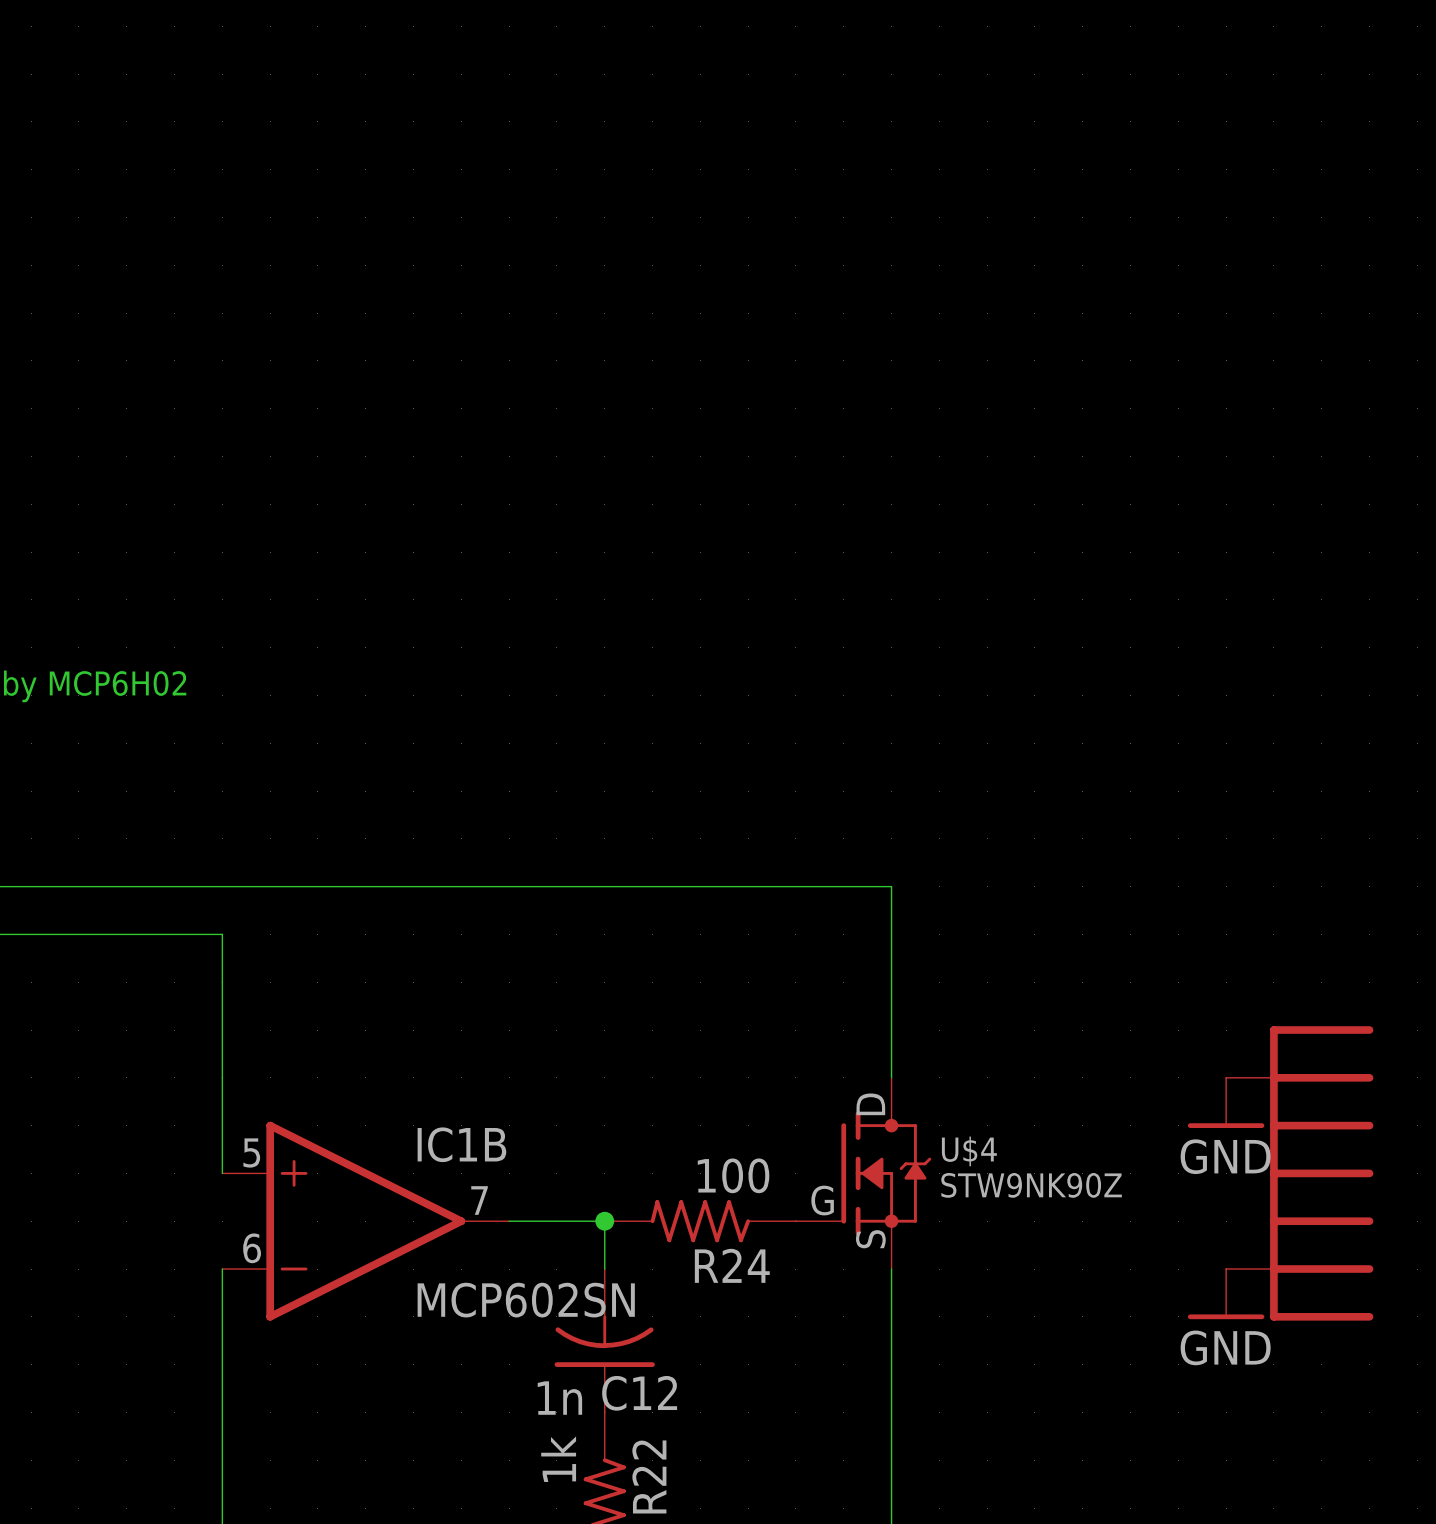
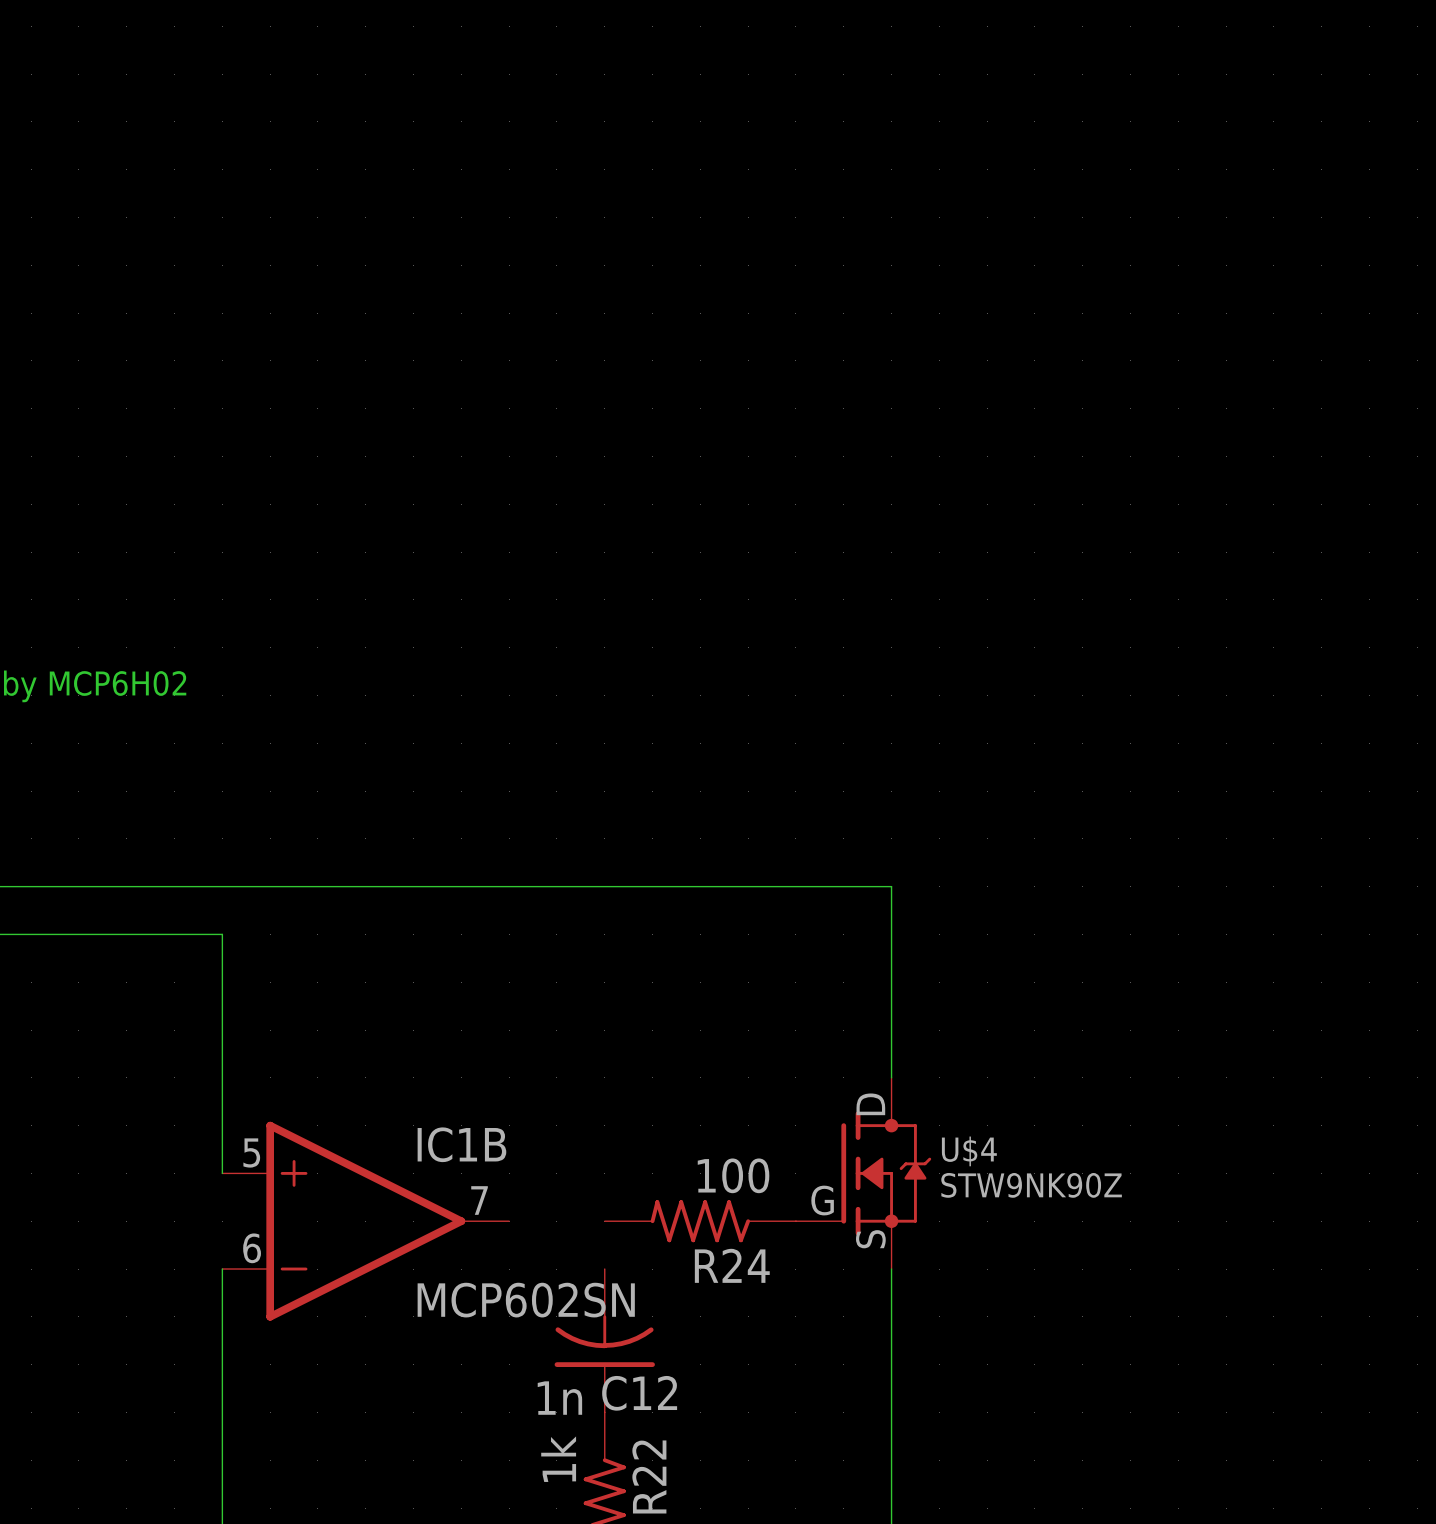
power symbol: GND (1226, 1102) -> none
part: (1299, 1173) -> none
wire: (509, 1221) (604, 1221) (604, 1269) -> none
junction: (604, 1221) -> none
power symbol: GND (1226, 1294) -> none

